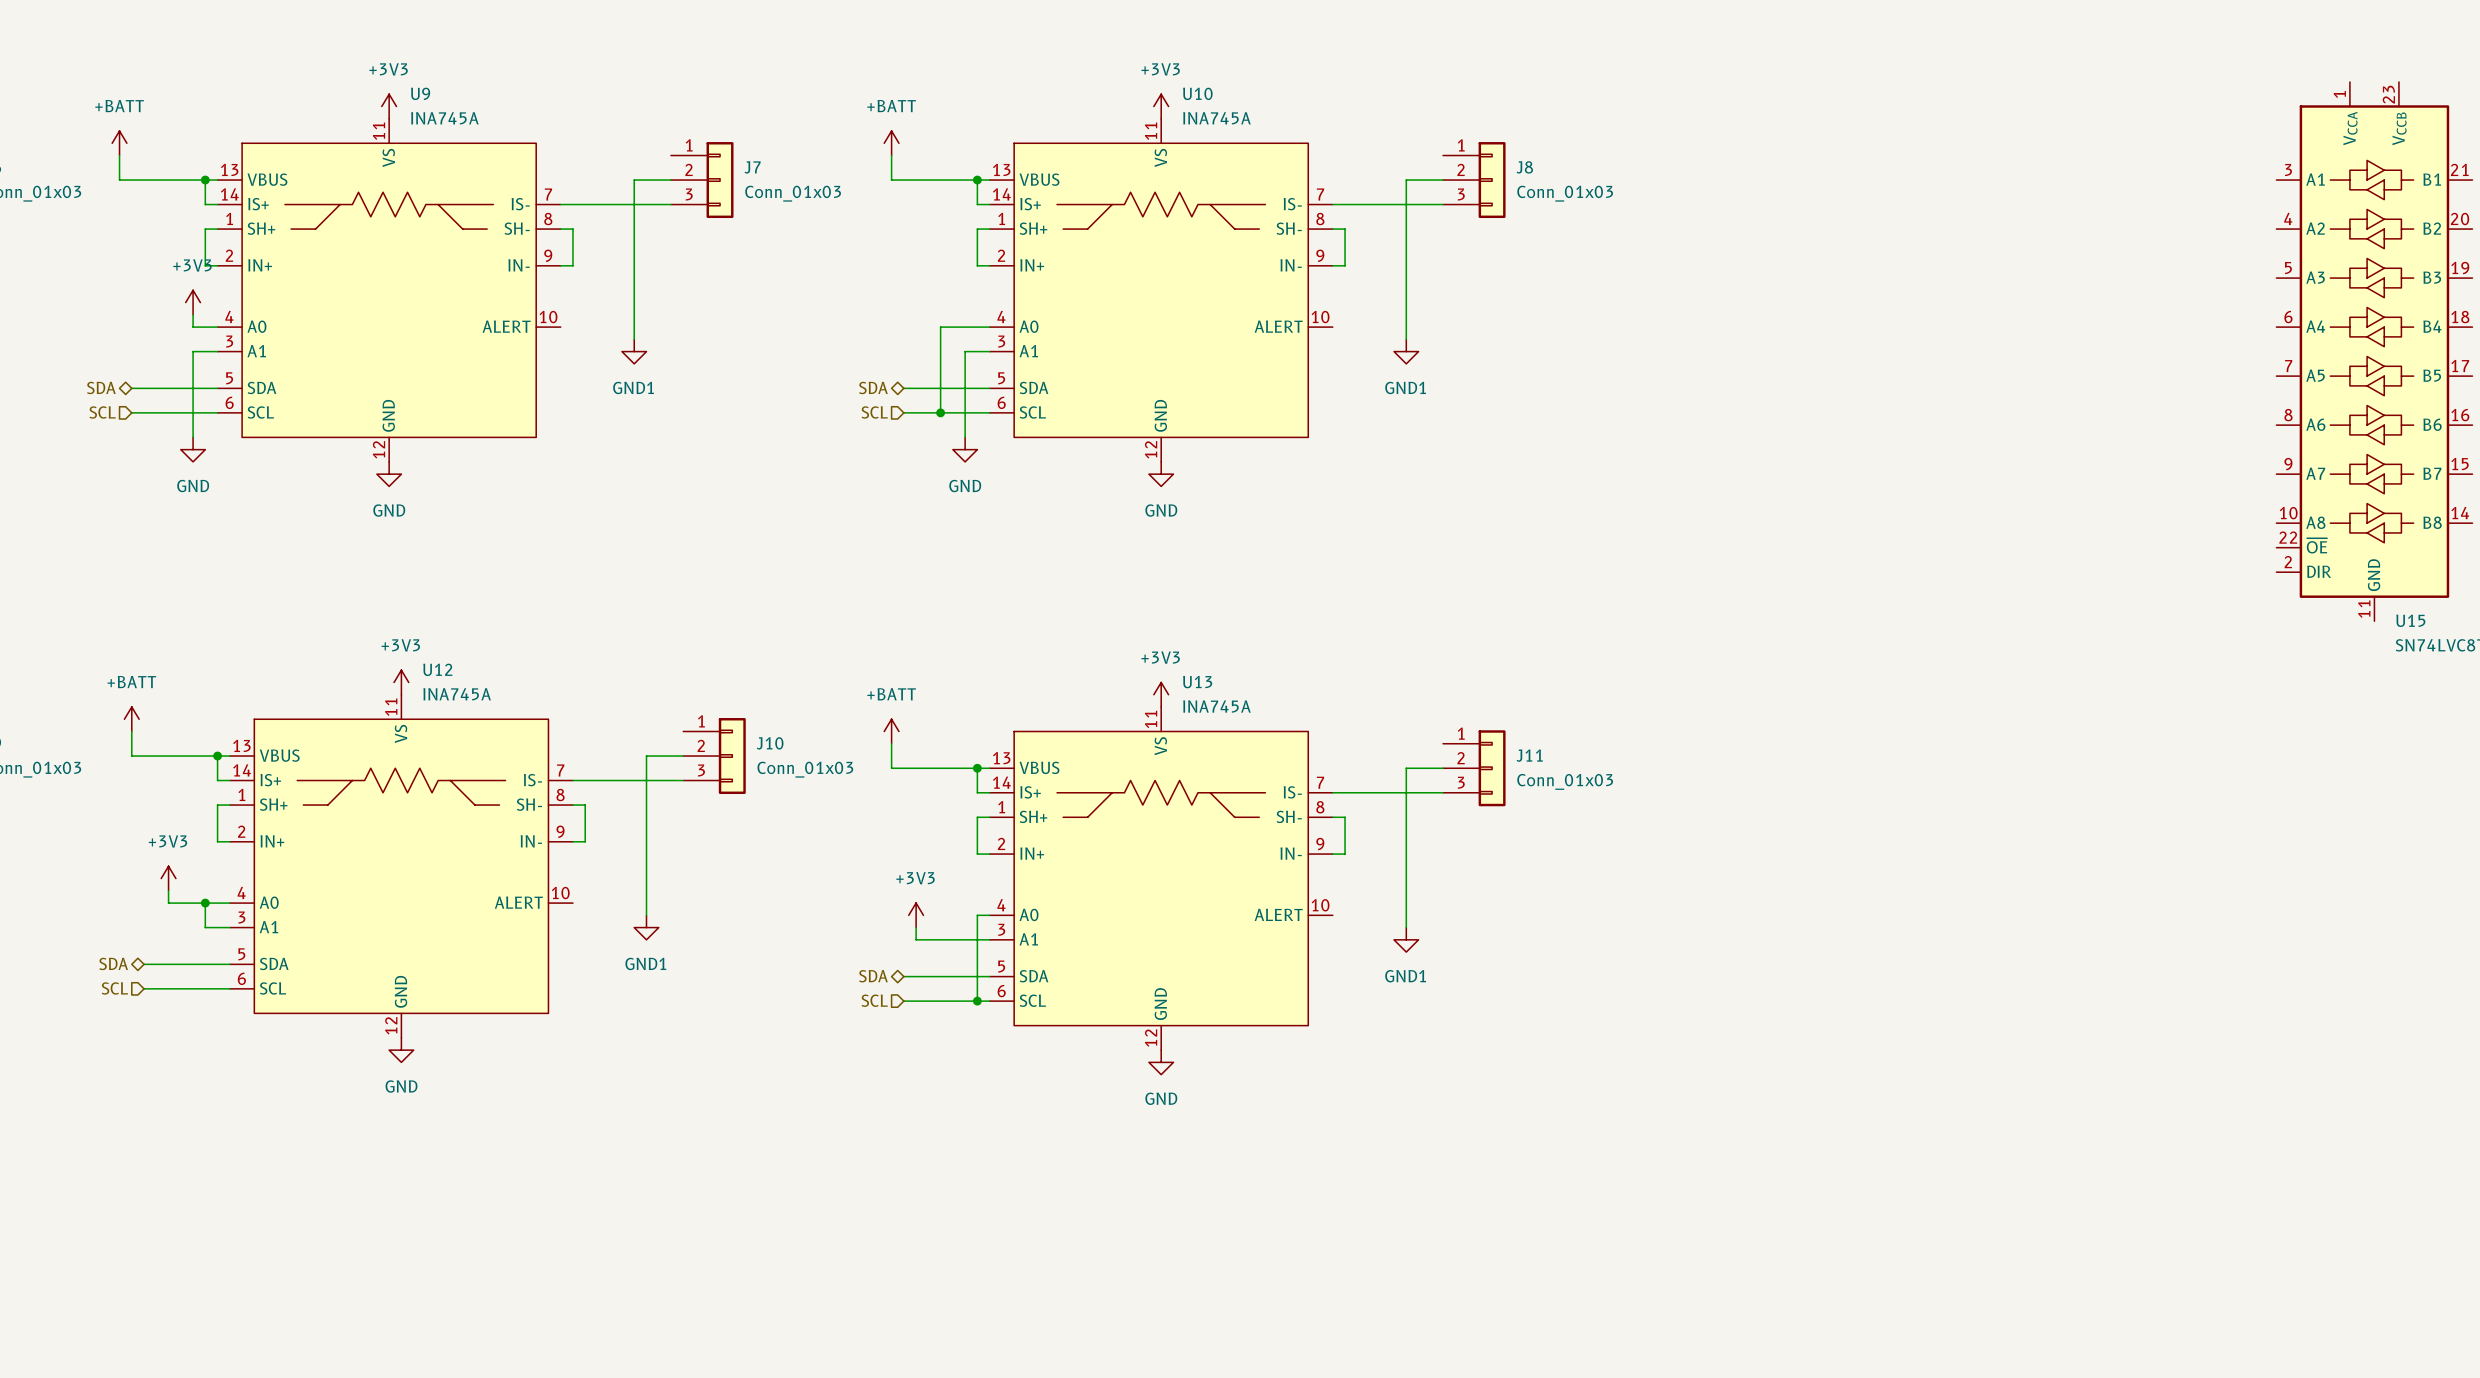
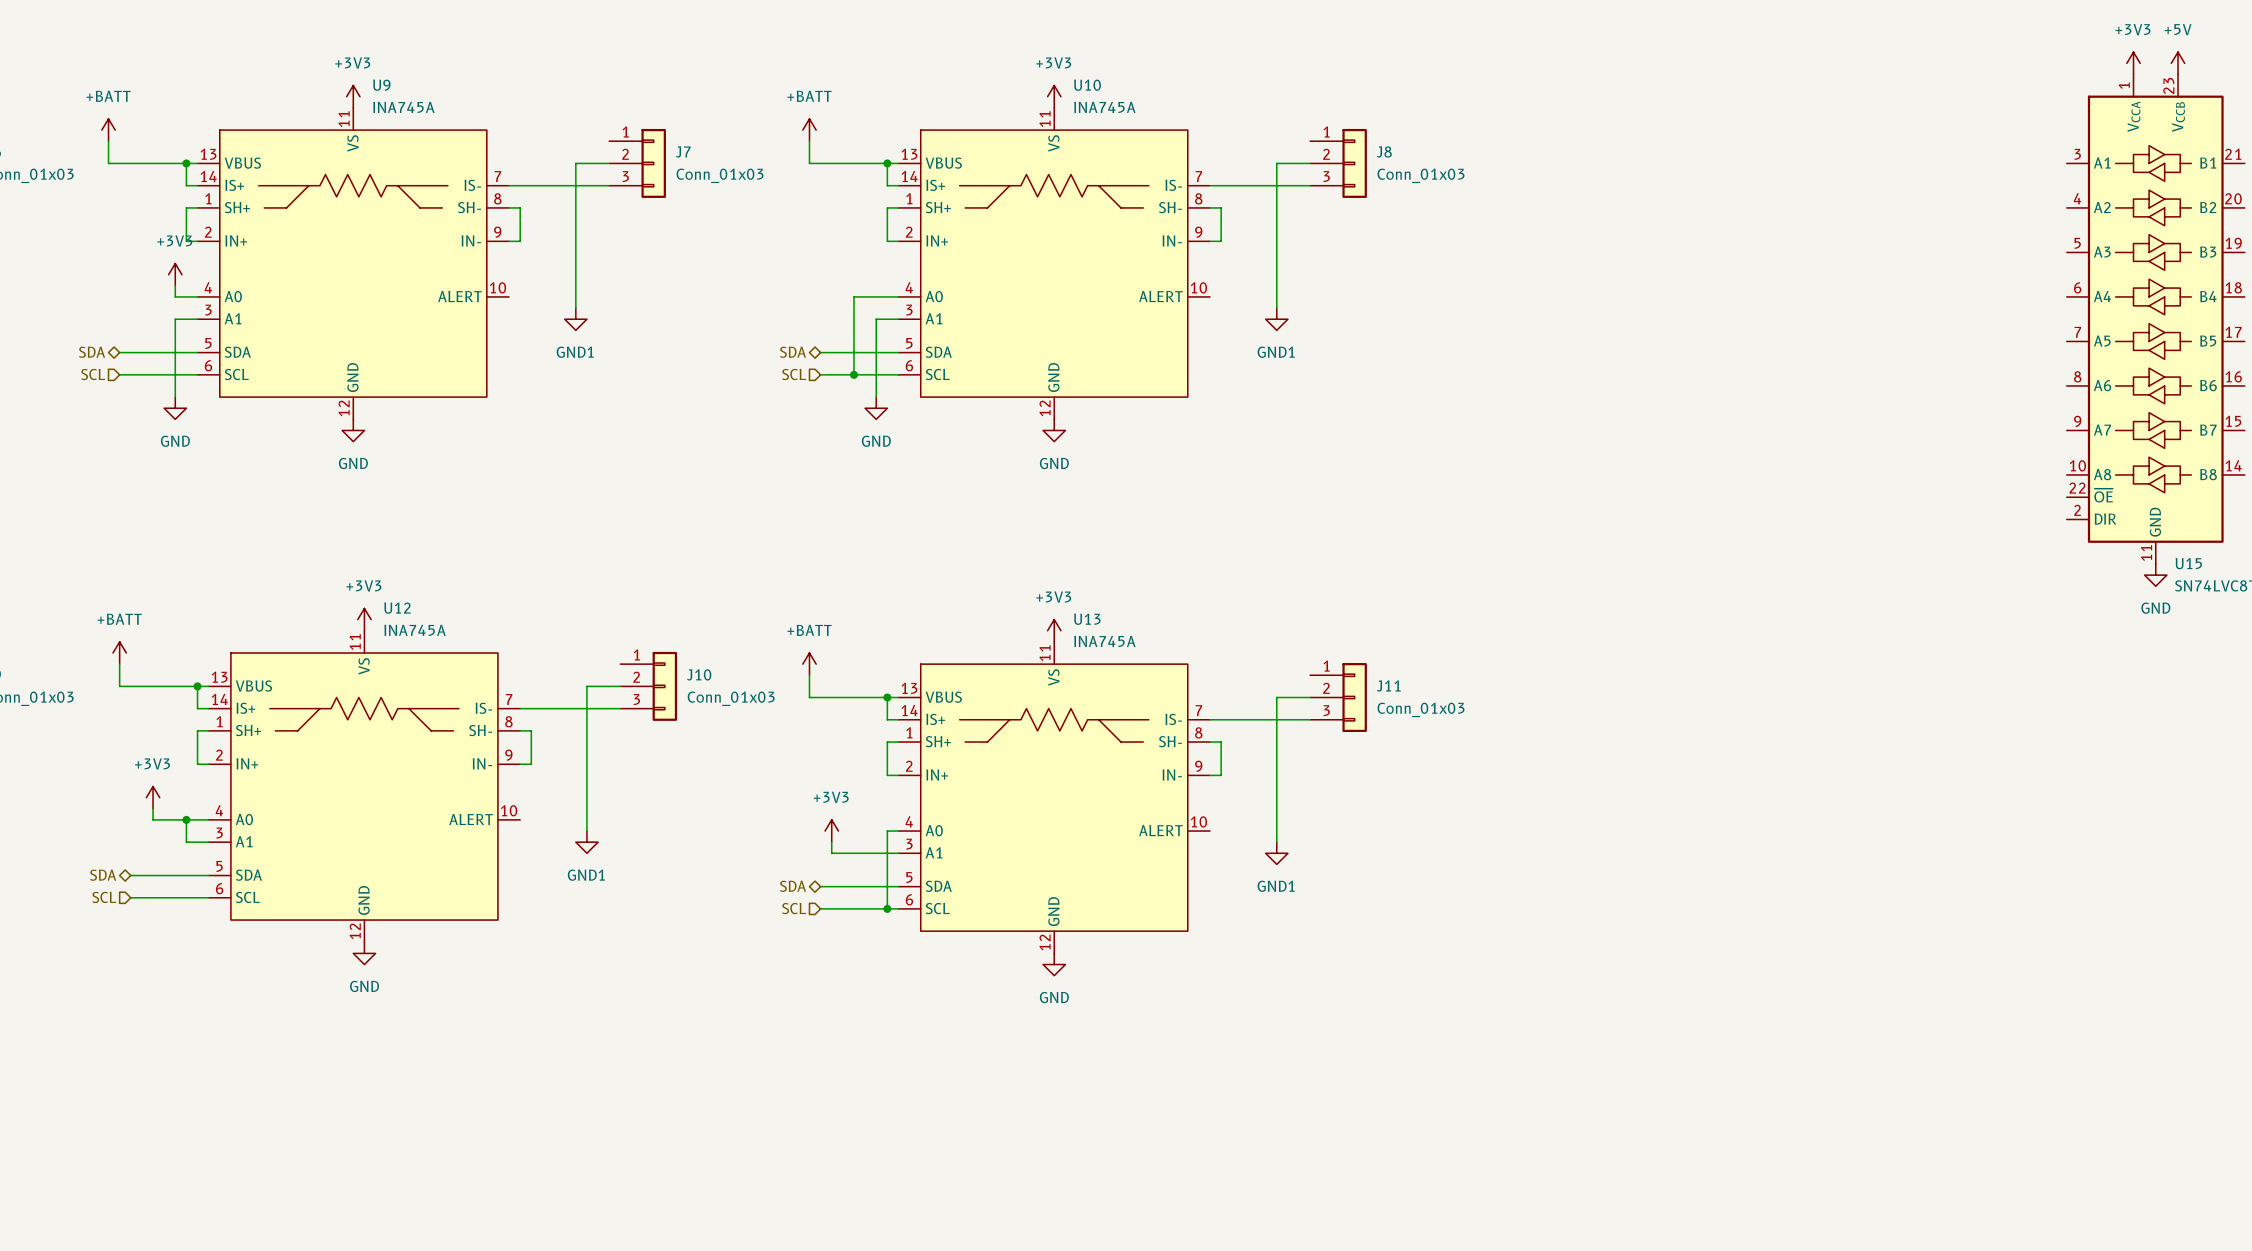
power symbol: none -> +3V3 (2133, 63)
power symbol: none -> +5V (2178, 63)
power symbol: none -> GND (2155, 575)

